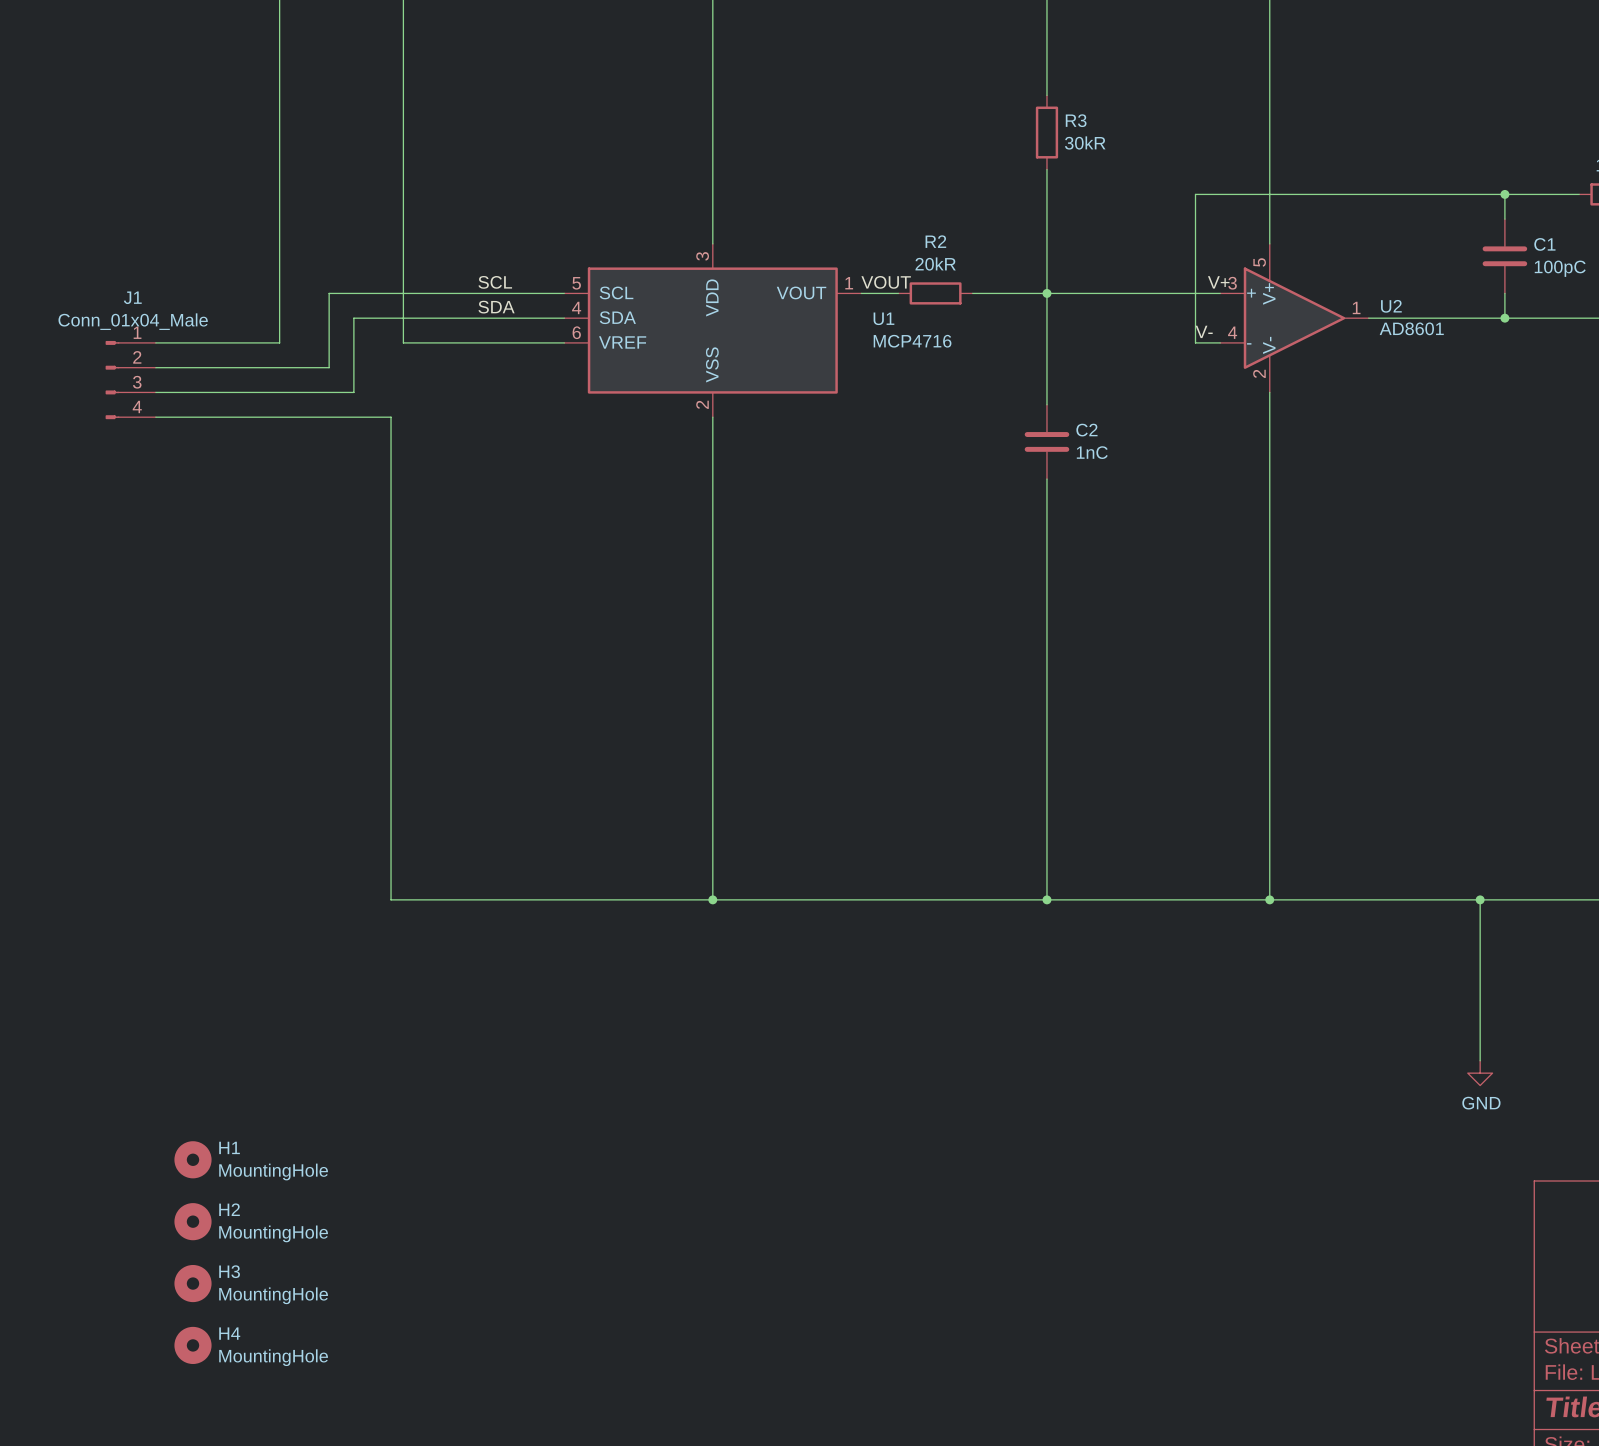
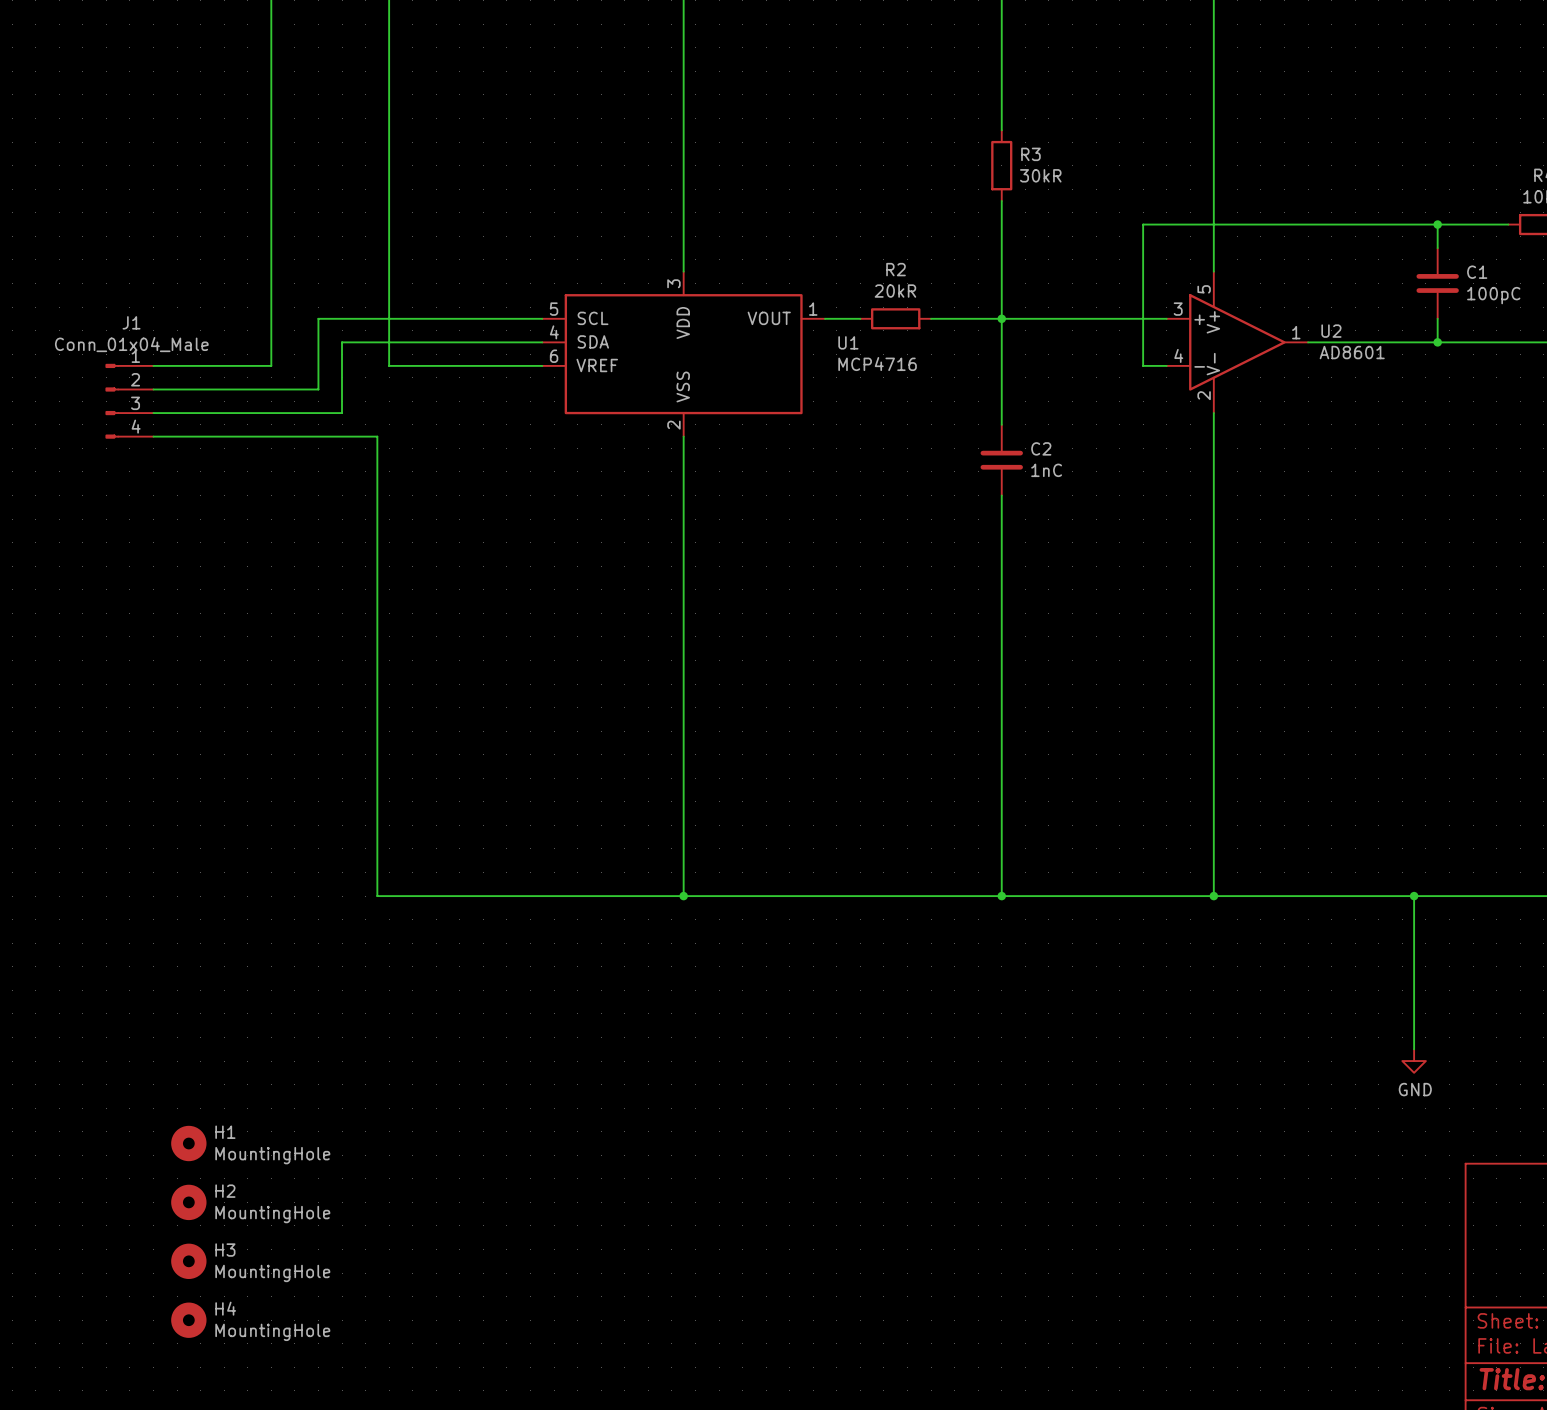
label: SCL (495, 282) -> none
label: VOUT (886, 282) -> none
label: V+ (1218, 282) -> none
label: SDA (496, 307) -> none
label: V- (1204, 331) -> none

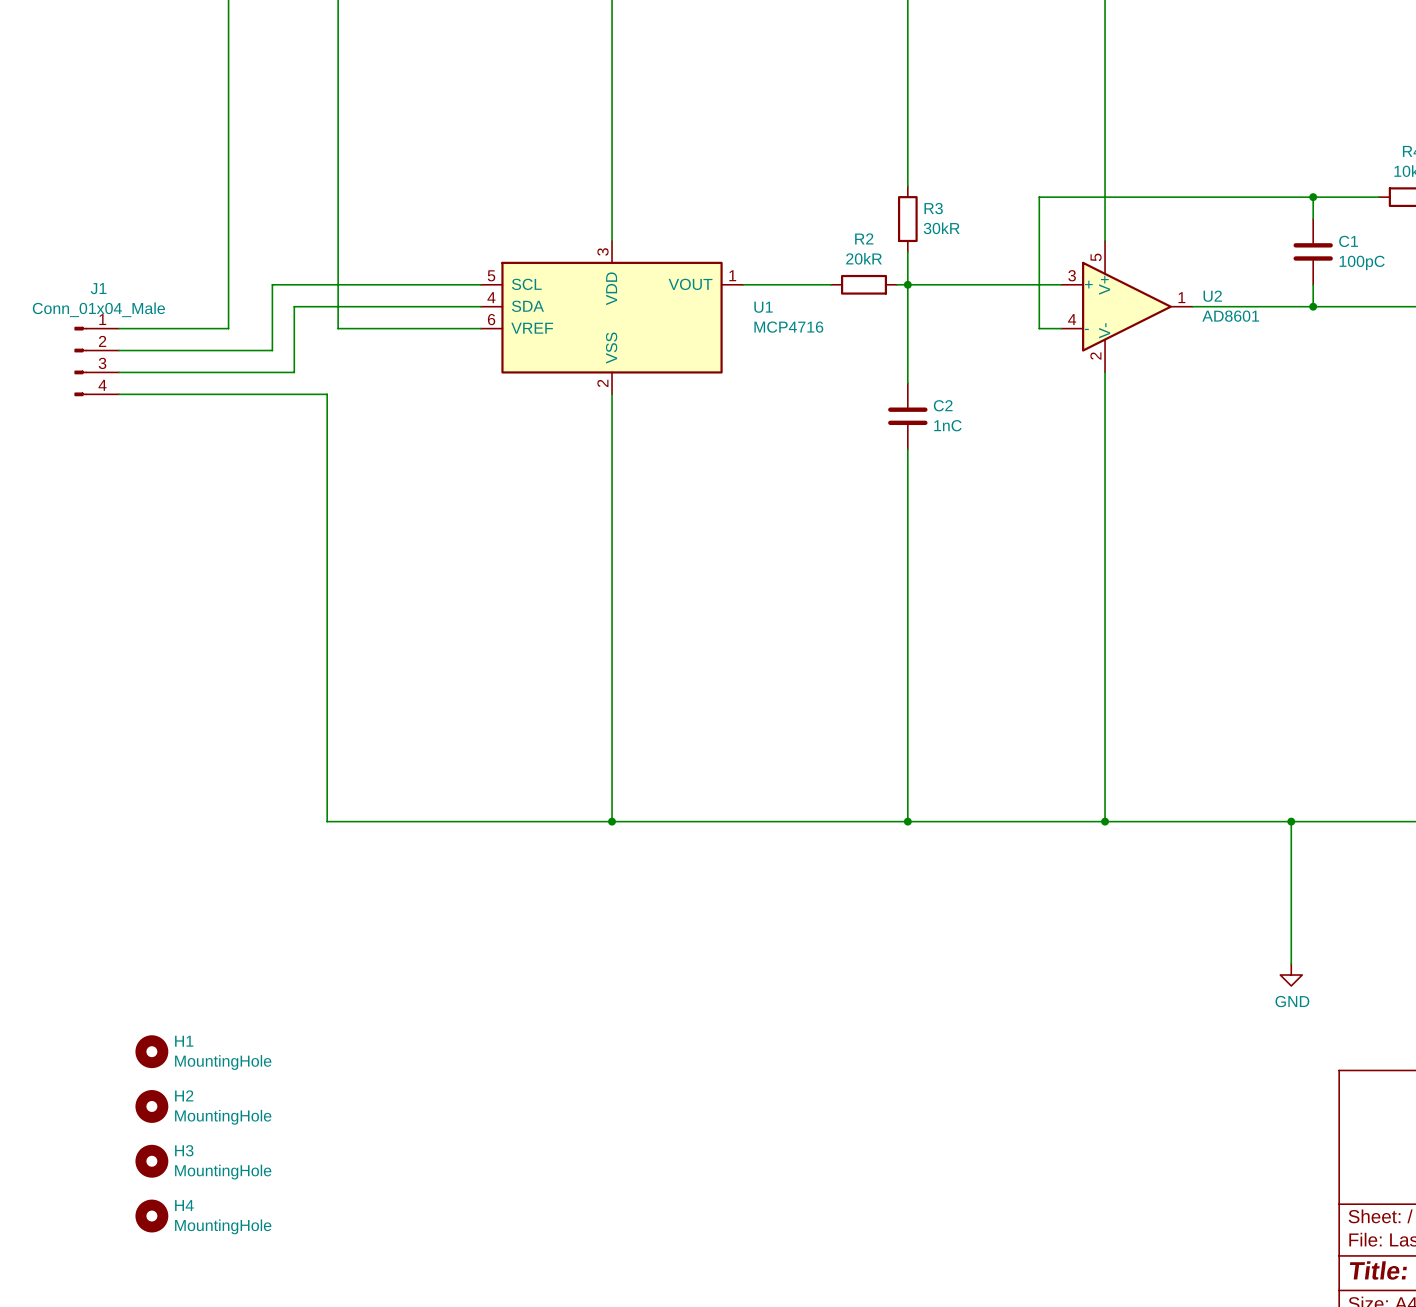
R3 position: (1001, 165) -> (907, 219)
wire: (1001, 212) (1001, 283) -> (907, 109) (907, 175)
R2 position: (895, 318) -> (864, 284)
wire: (931, 318) (989, 318) -> (776, 284) (831, 284)

